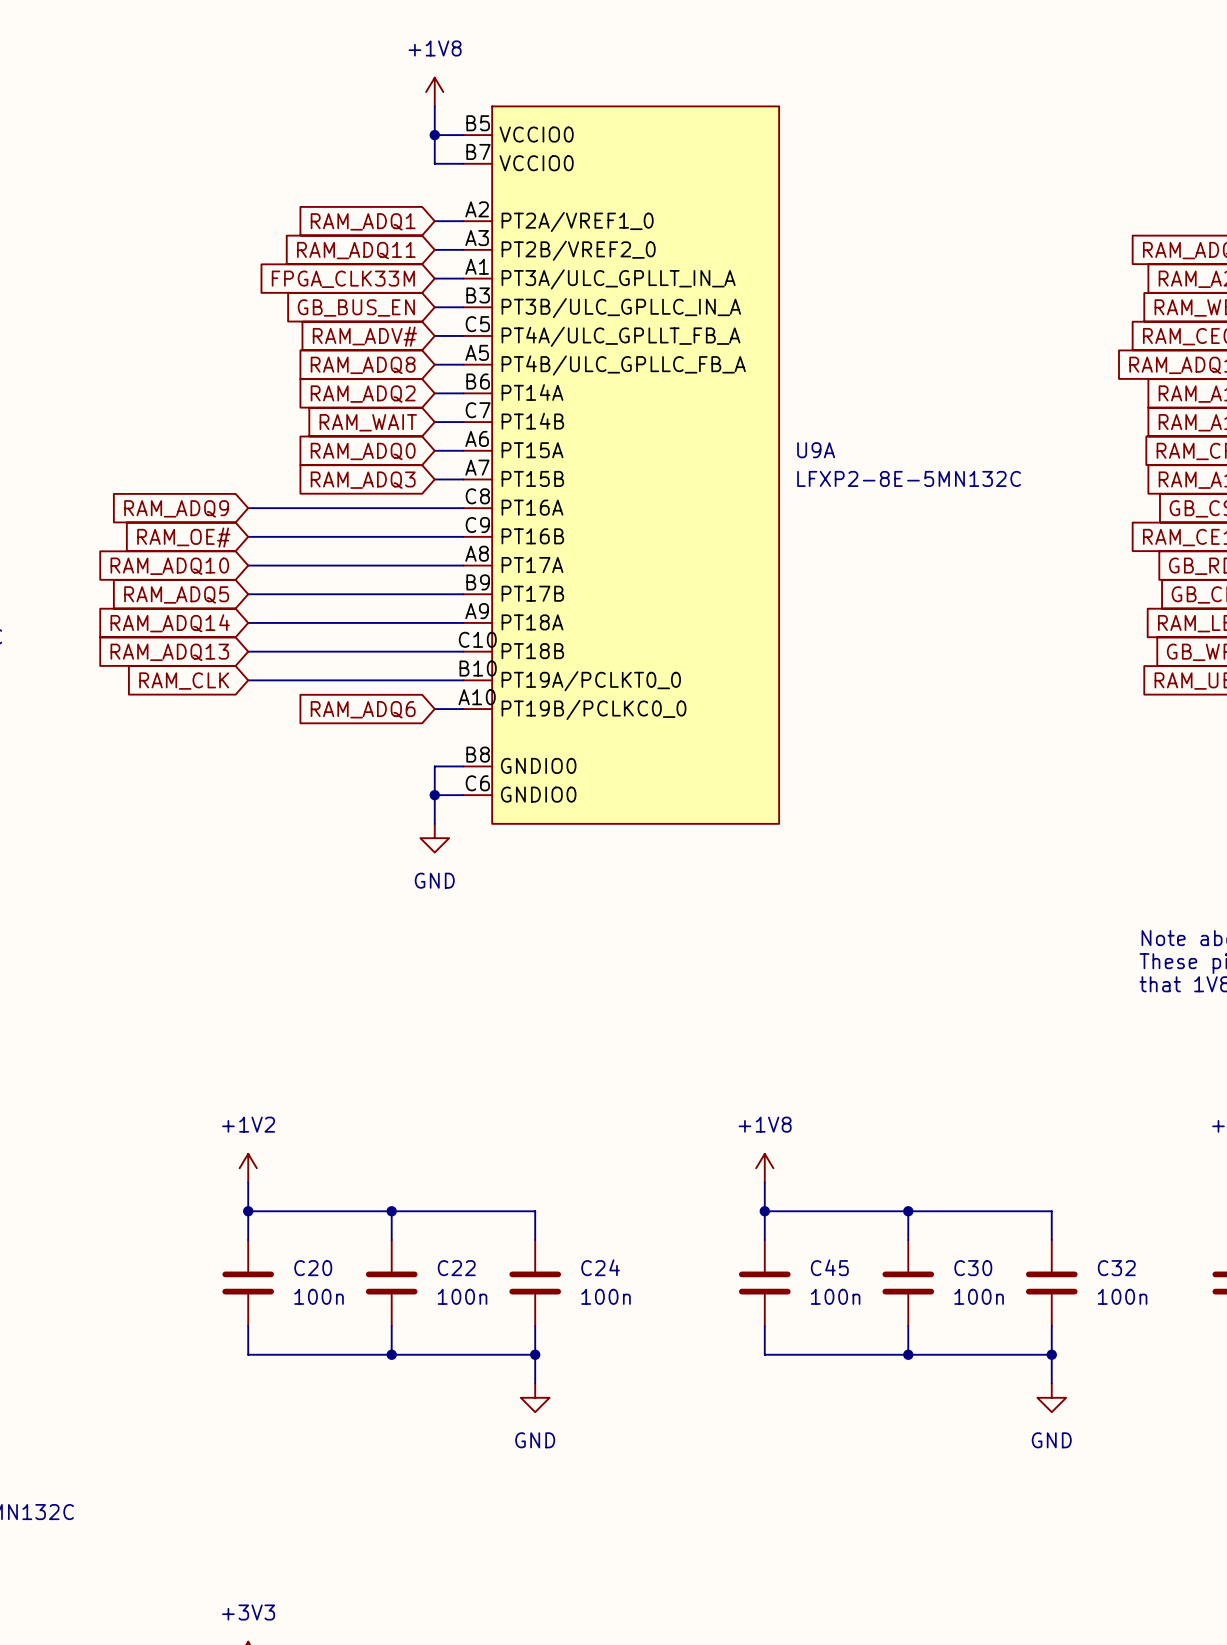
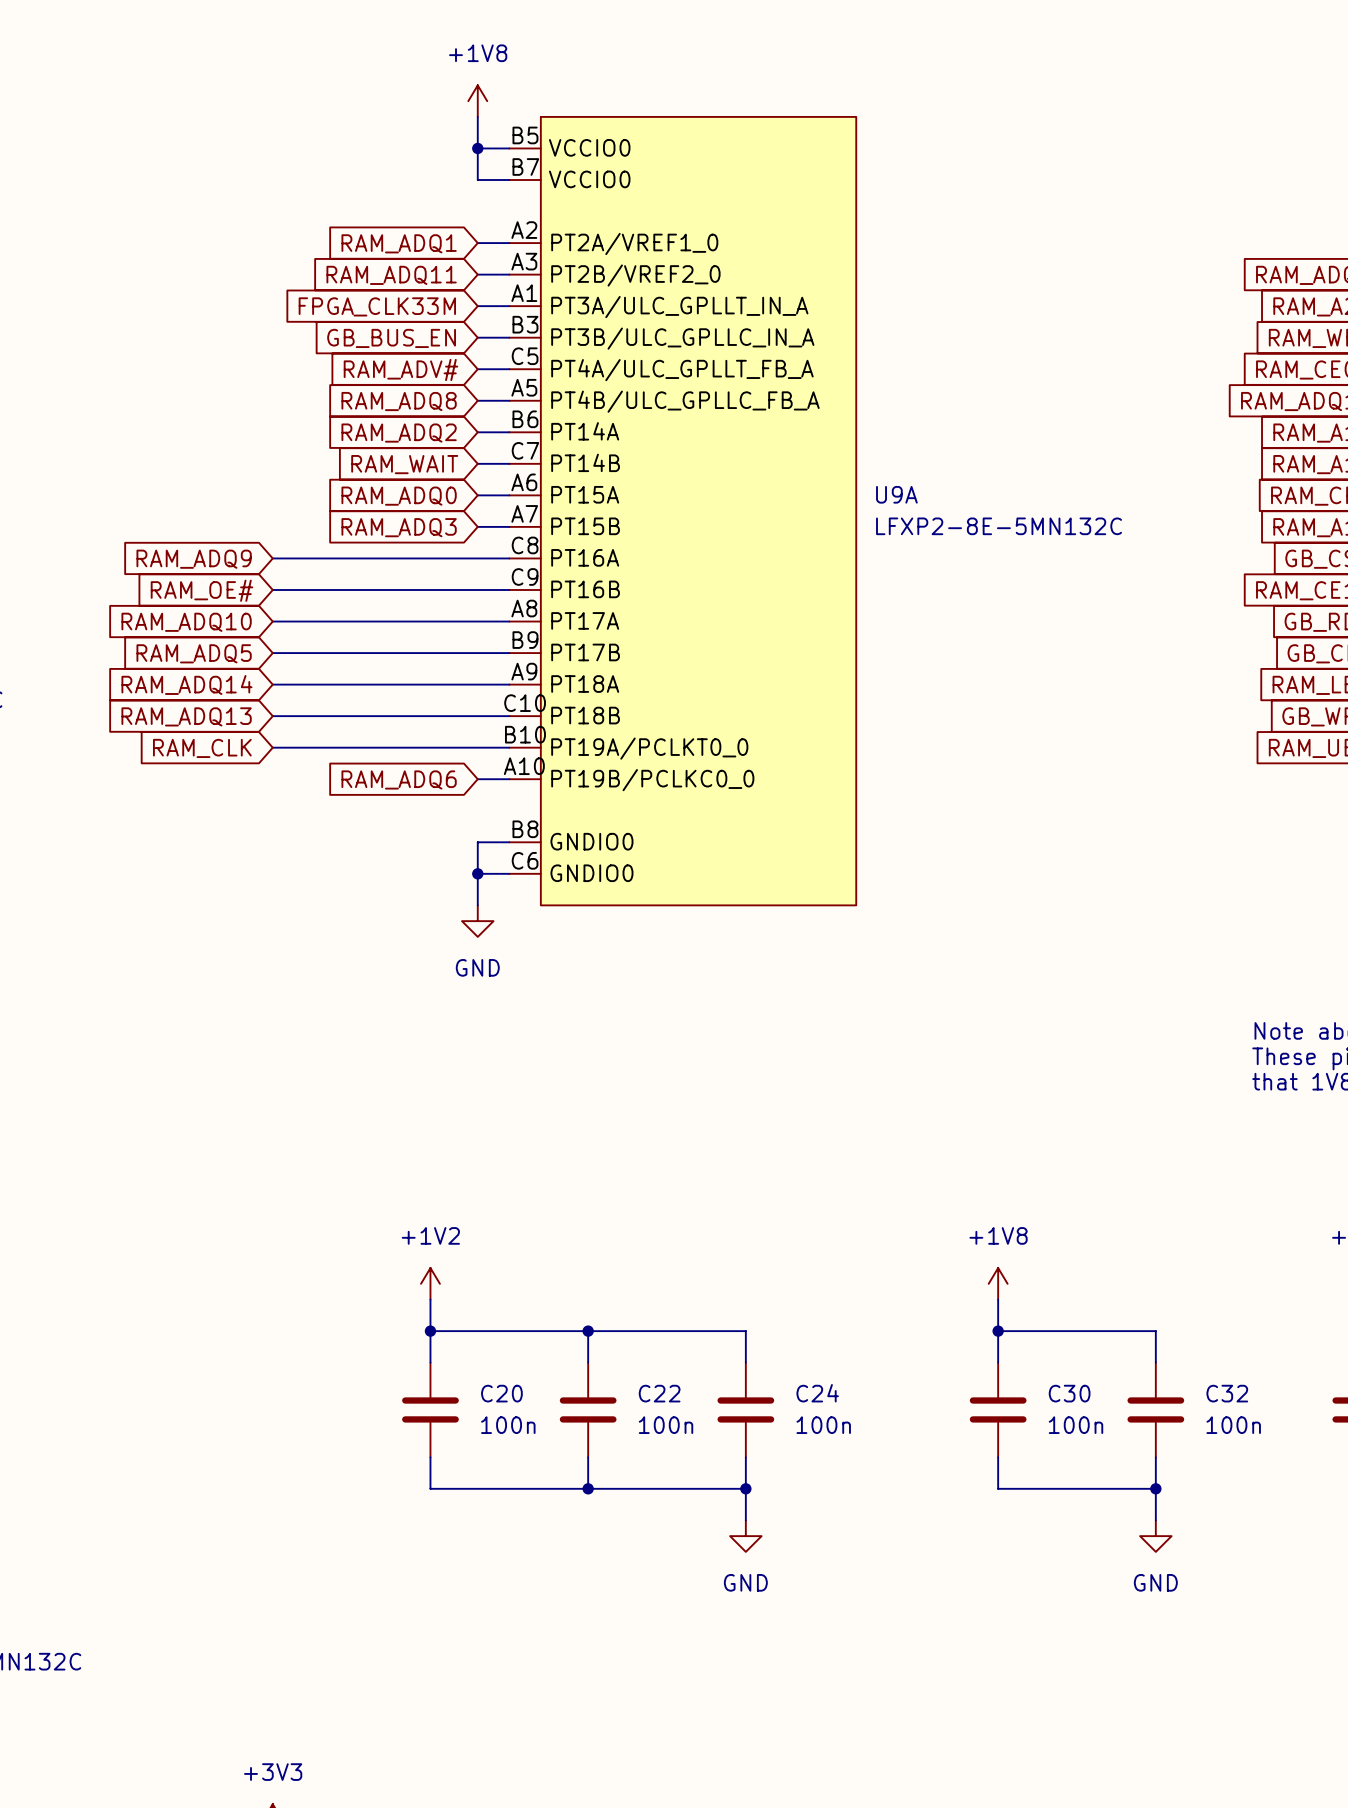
power symbol position: +1V2 (248, 1168) -> +1V2 (430, 1283)
power symbol position: +1V8 (764, 1168) -> +1V8 (998, 1283)
wire: (248, 1182) (248, 1239) -> none
wire: (764, 1182) (764, 1239) -> (745, 1457) (745, 1520)
wire: (248, 1211) (391, 1211) -> (430, 1299) (430, 1331)
junction: (248, 1211) -> none
wire: none -> (588, 1331) (745, 1331) (745, 1362)
junction: none -> (588, 1331)
wire: (764, 1211) (908, 1211) -> (998, 1299) (998, 1331)
junction: (764, 1211) -> none
C24 name: C24 (600, 1267) -> C22 (659, 1393)
C22 name: C22 (456, 1268) -> C20 (501, 1393)
C20: 100n (248, 1283) -> none
C24: none -> 100n (745, 1409)
C45: 100n (764, 1283) -> none
wire: (248, 1326) (248, 1354) (391, 1354) -> none
wire: (764, 1326) (764, 1354) (908, 1354) -> none
junction: (391, 1354) -> none
wire: (535, 1354) (535, 1383) -> (588, 1488) (745, 1488)
junction: none -> (745, 1488)
junction: (908, 1354) -> none
power symbol position: GND (535, 1397) -> GND (745, 1536)

